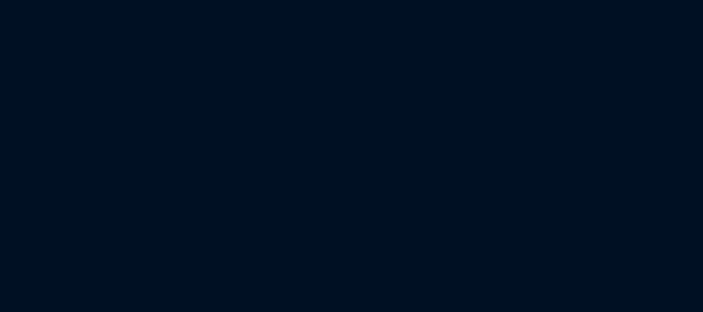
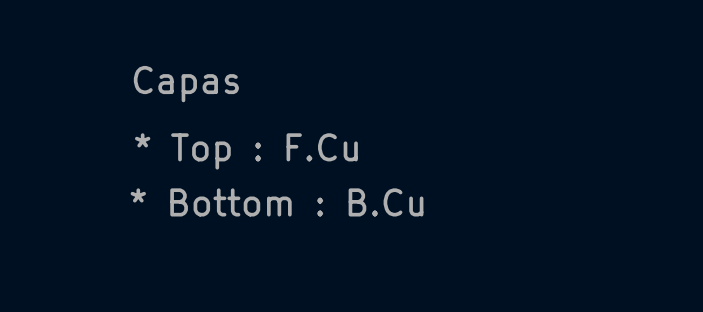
text: none -> Capas (186, 84)
text: none -> * Top : F.Cu (246, 151)
text: none -> * Bottom : B.Cu (277, 202)

